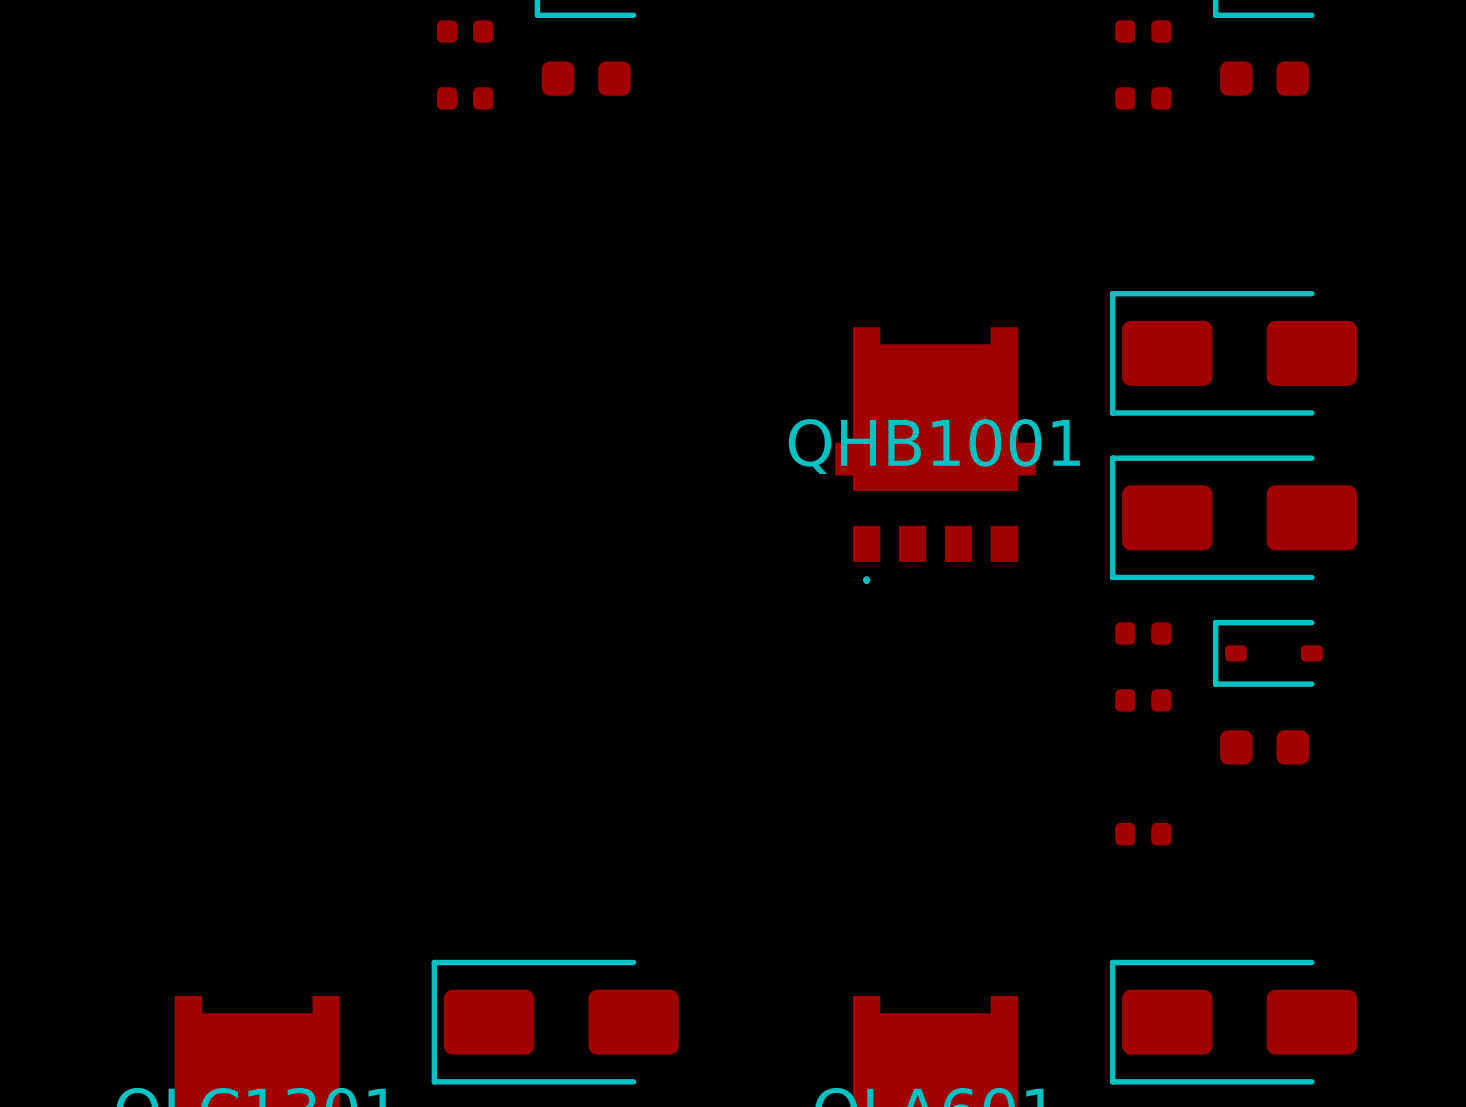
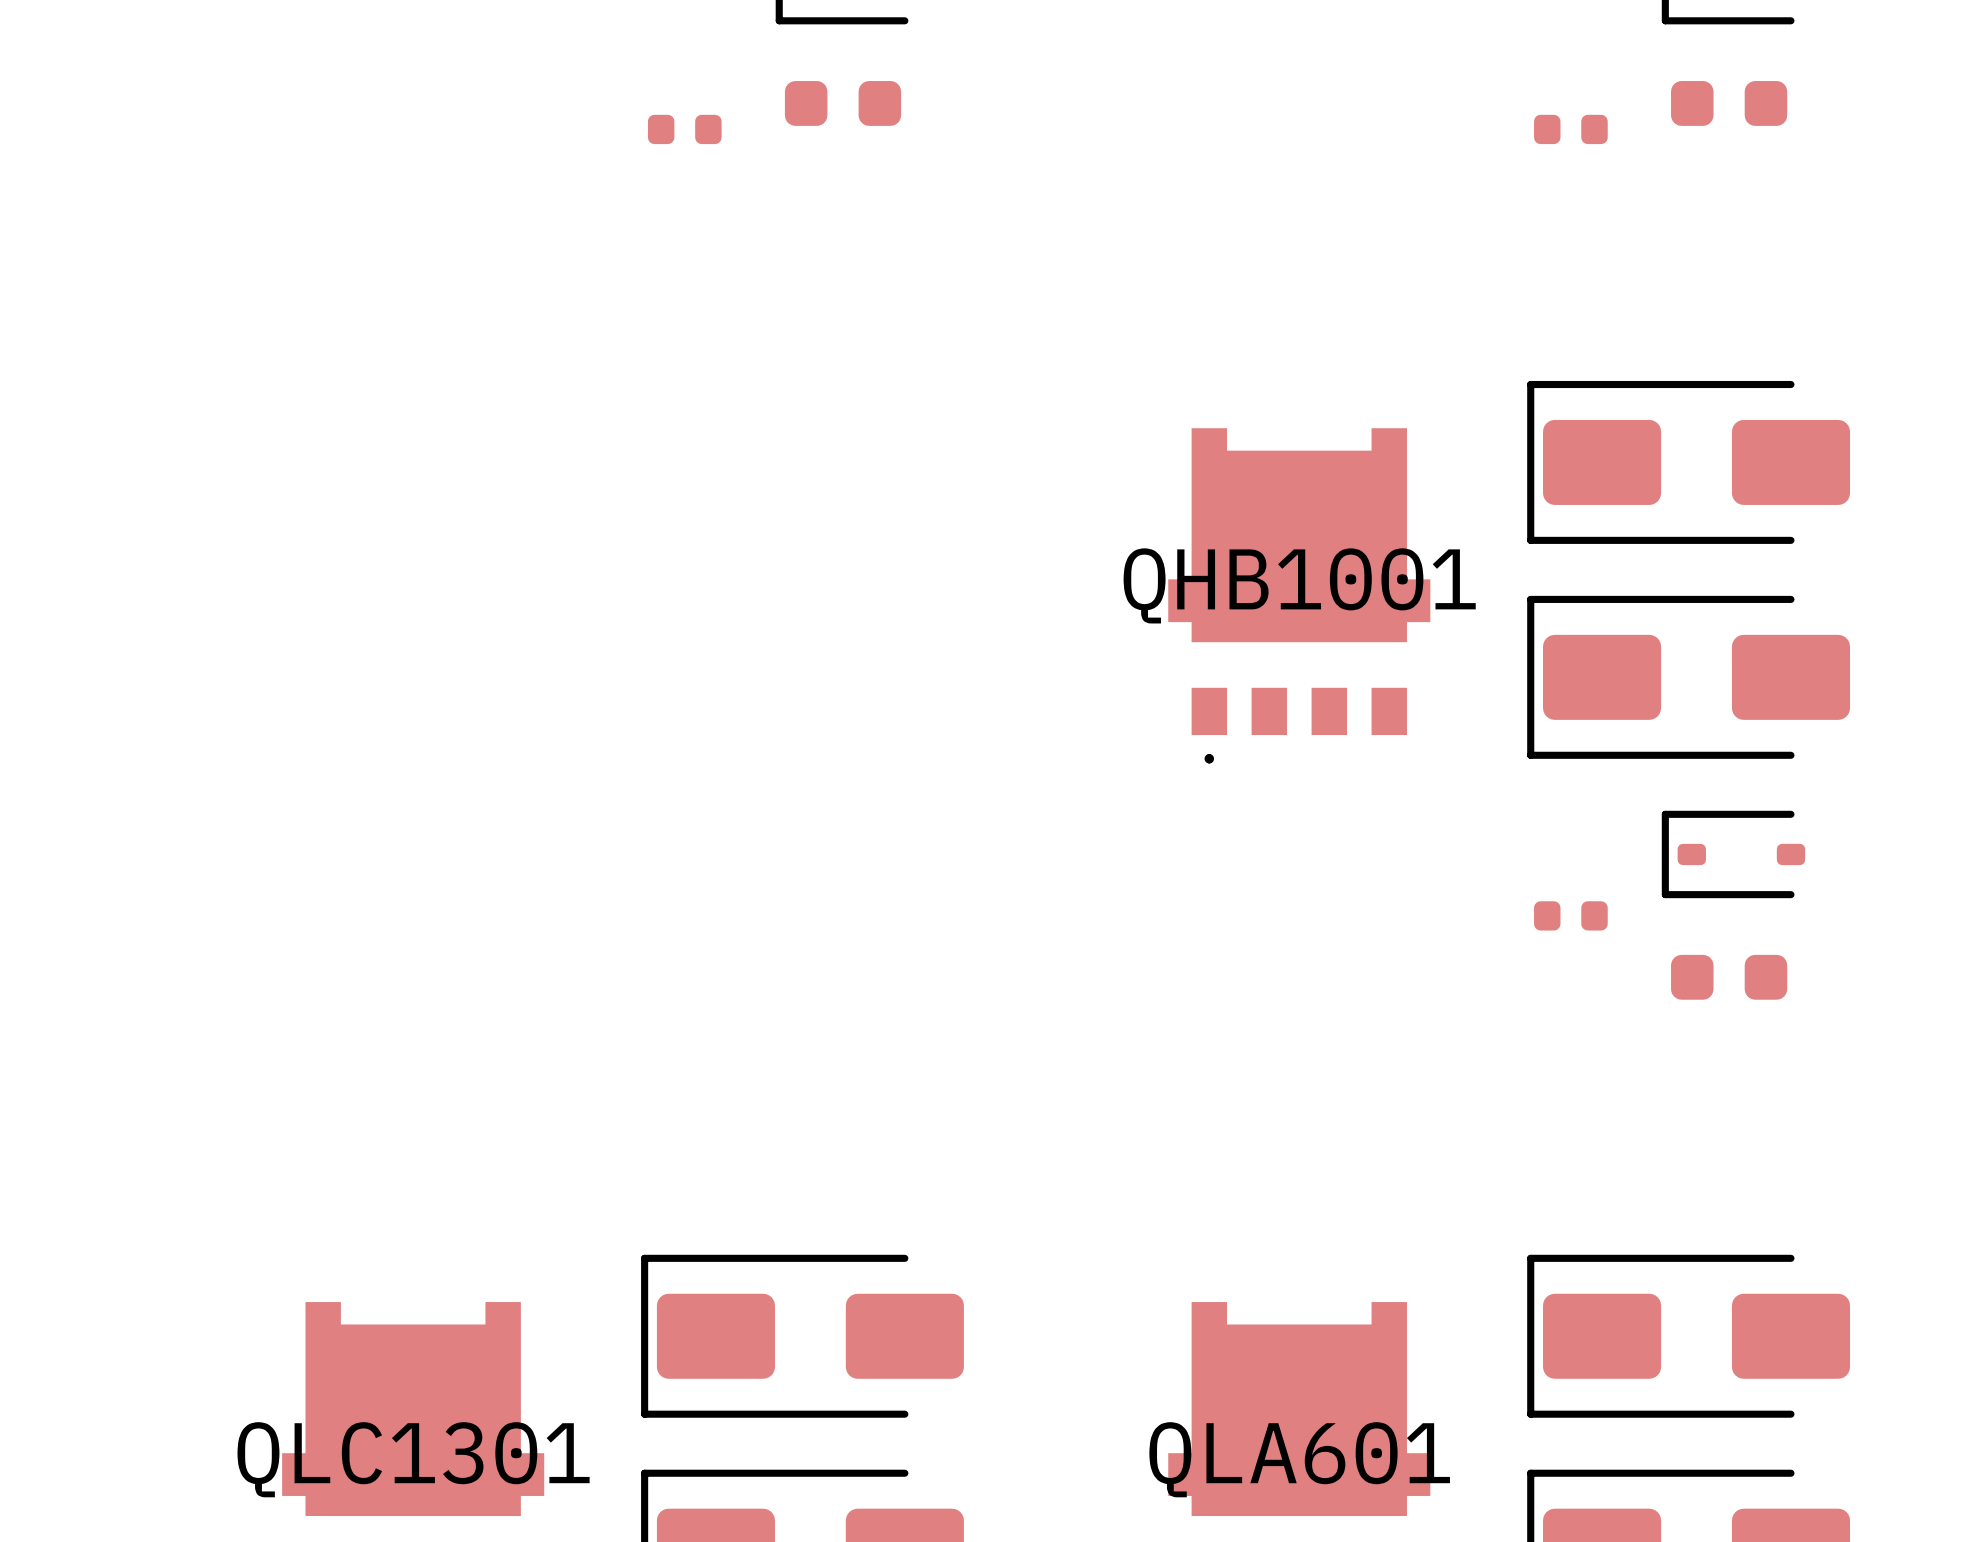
part: (465, 31) -> none
part: (1143, 31) -> none
part: (1143, 633) -> none
part: (1143, 834) -> none

